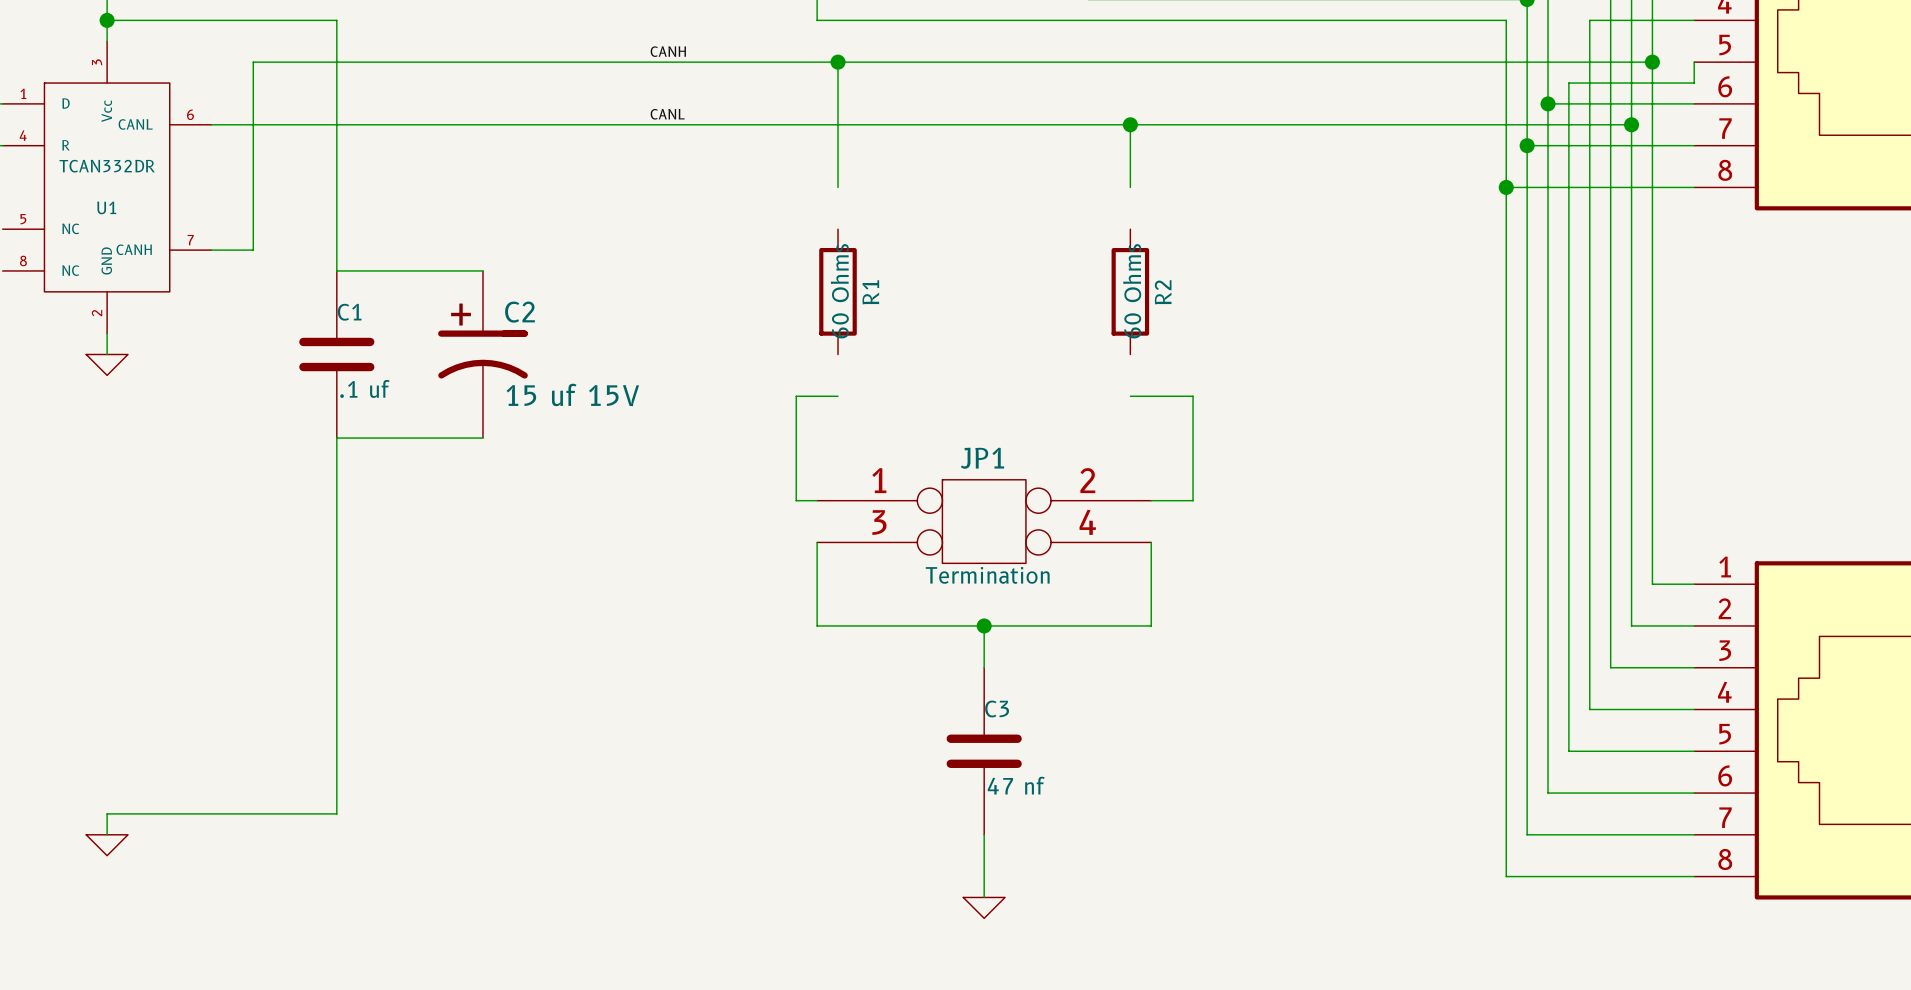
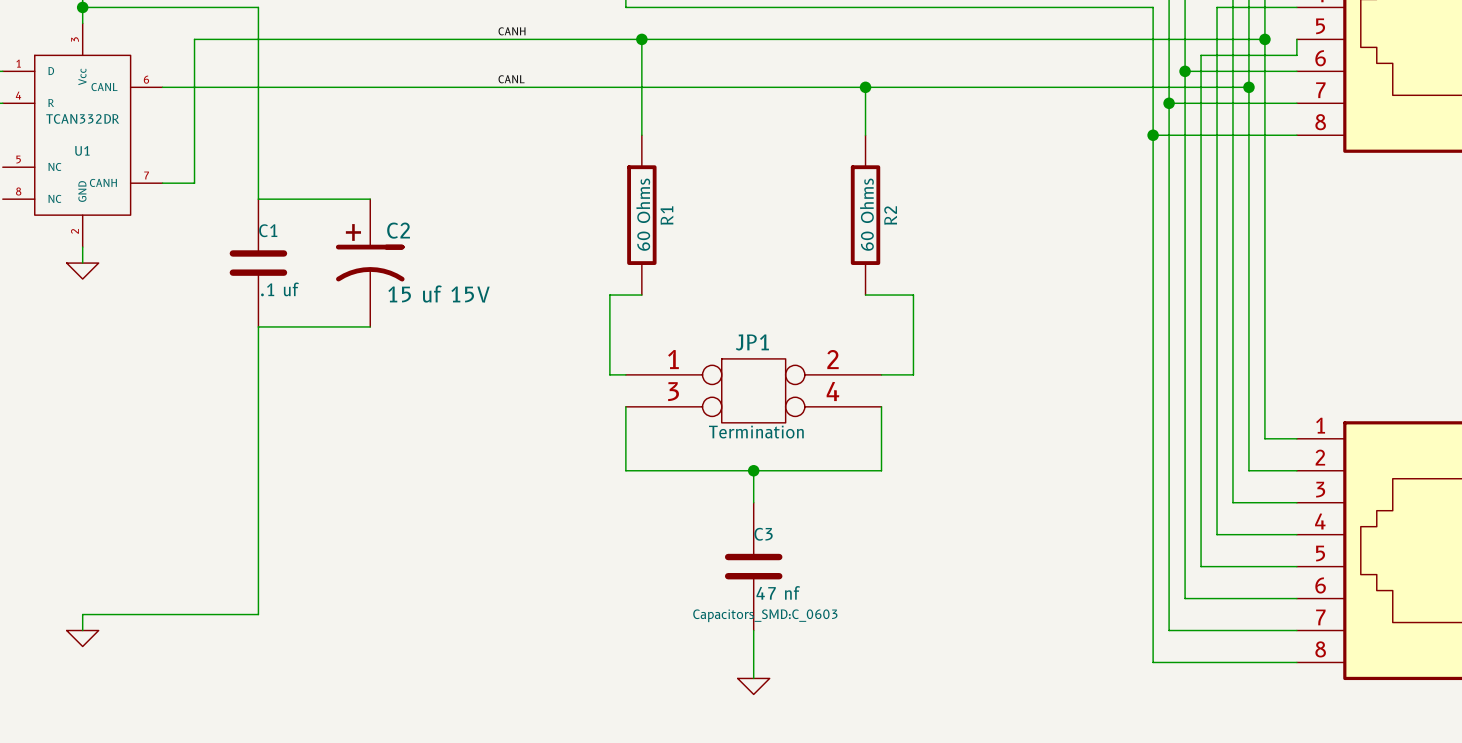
R1 symbol: [819, 229, 857, 355] -> [627, 135, 657, 296]
R2 symbol: [1111, 229, 1150, 355] -> [850, 135, 881, 296]
C3 text: none -> Capacitors_SMD:C_0603 (765, 615)

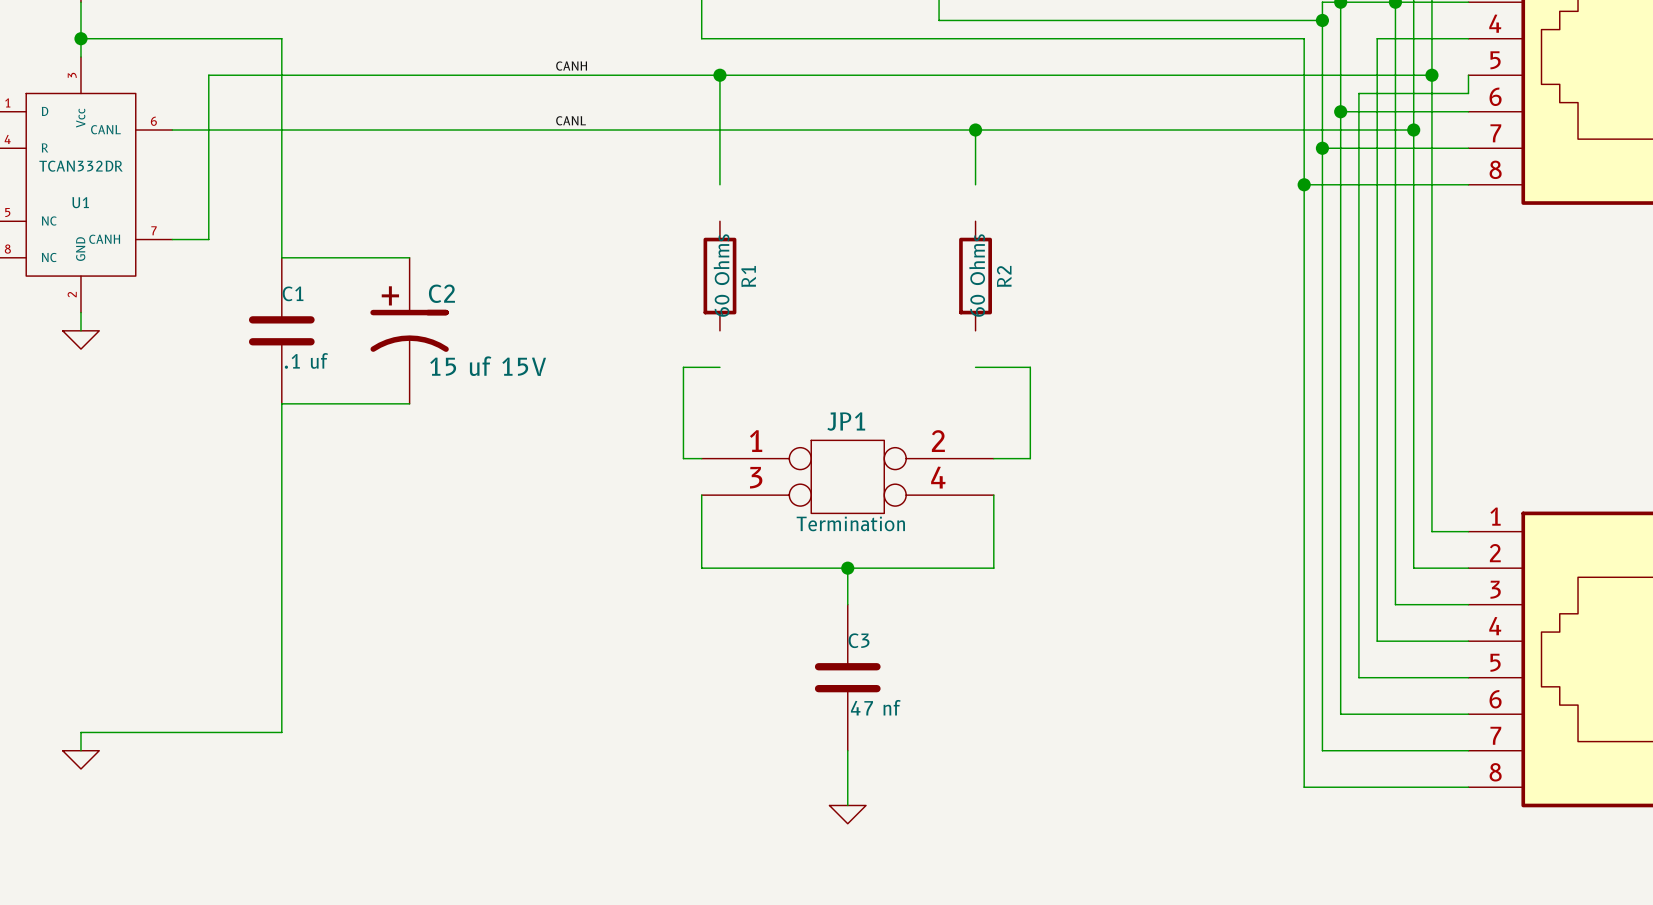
R1 symbol: [627, 135, 657, 296] -> [703, 221, 737, 331]
R2 symbol: [850, 135, 881, 296] -> [959, 221, 992, 331]
C3 text: Capacitors_SMD:C_0603 (765, 615) -> none

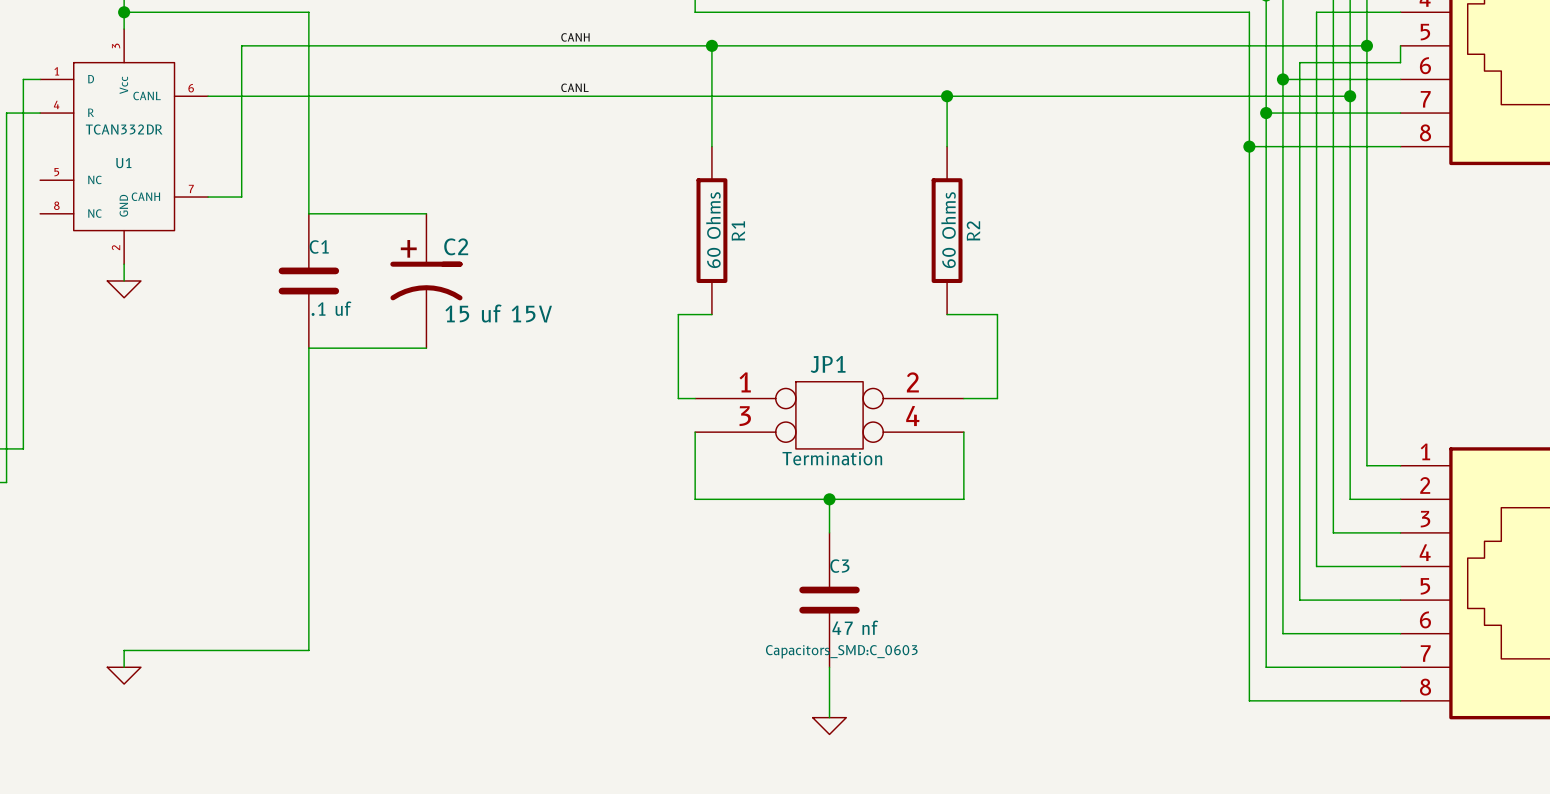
R1 symbol: [703, 221, 737, 331] -> [696, 146, 728, 315]
R2 symbol: [959, 221, 992, 331] -> [931, 146, 963, 315]
C3 text: none -> Capacitors_SMD:C_0603 (841, 651)

